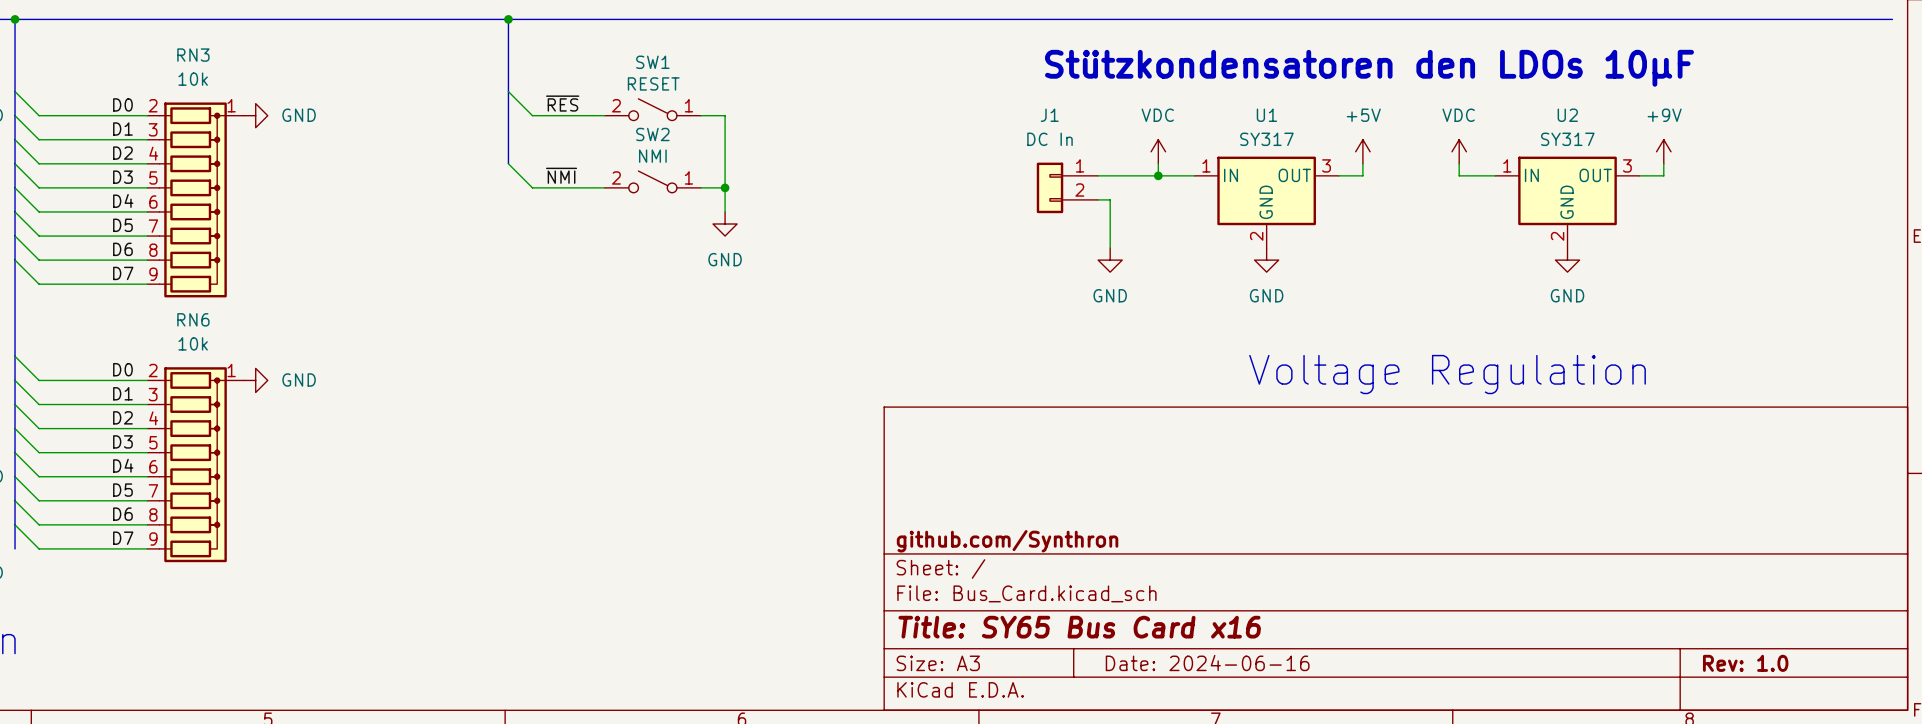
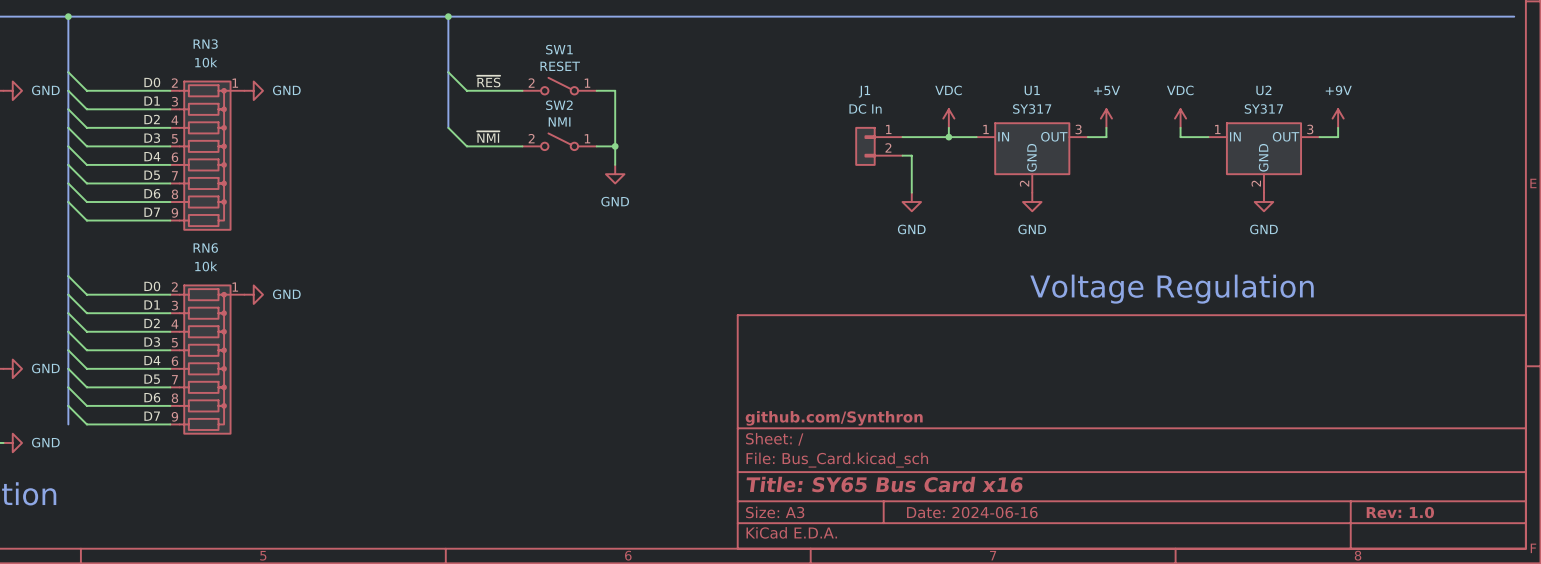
text: Stützkondensatoren den LDOs 10µF (1369, 68) -> none

